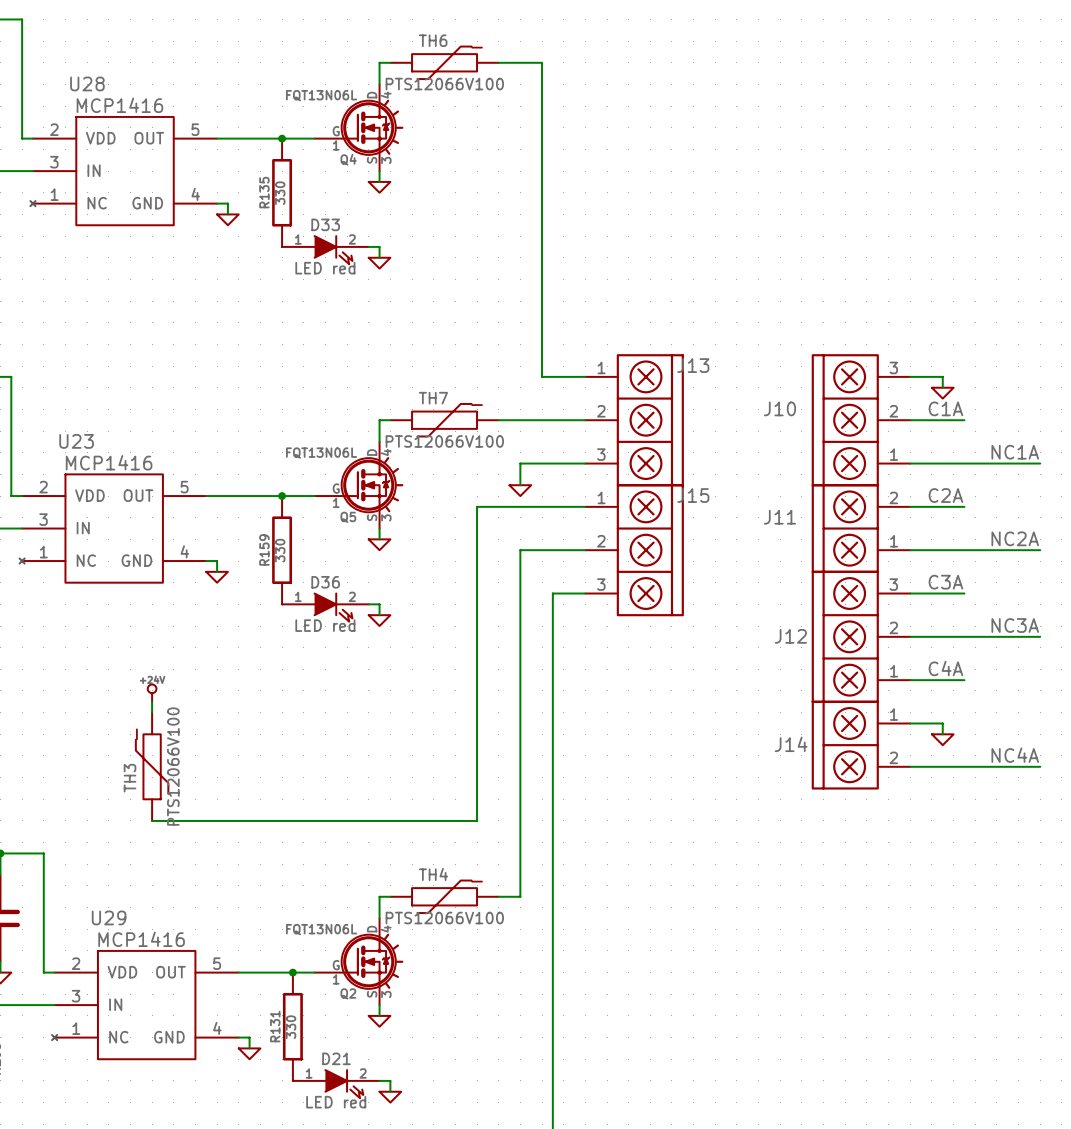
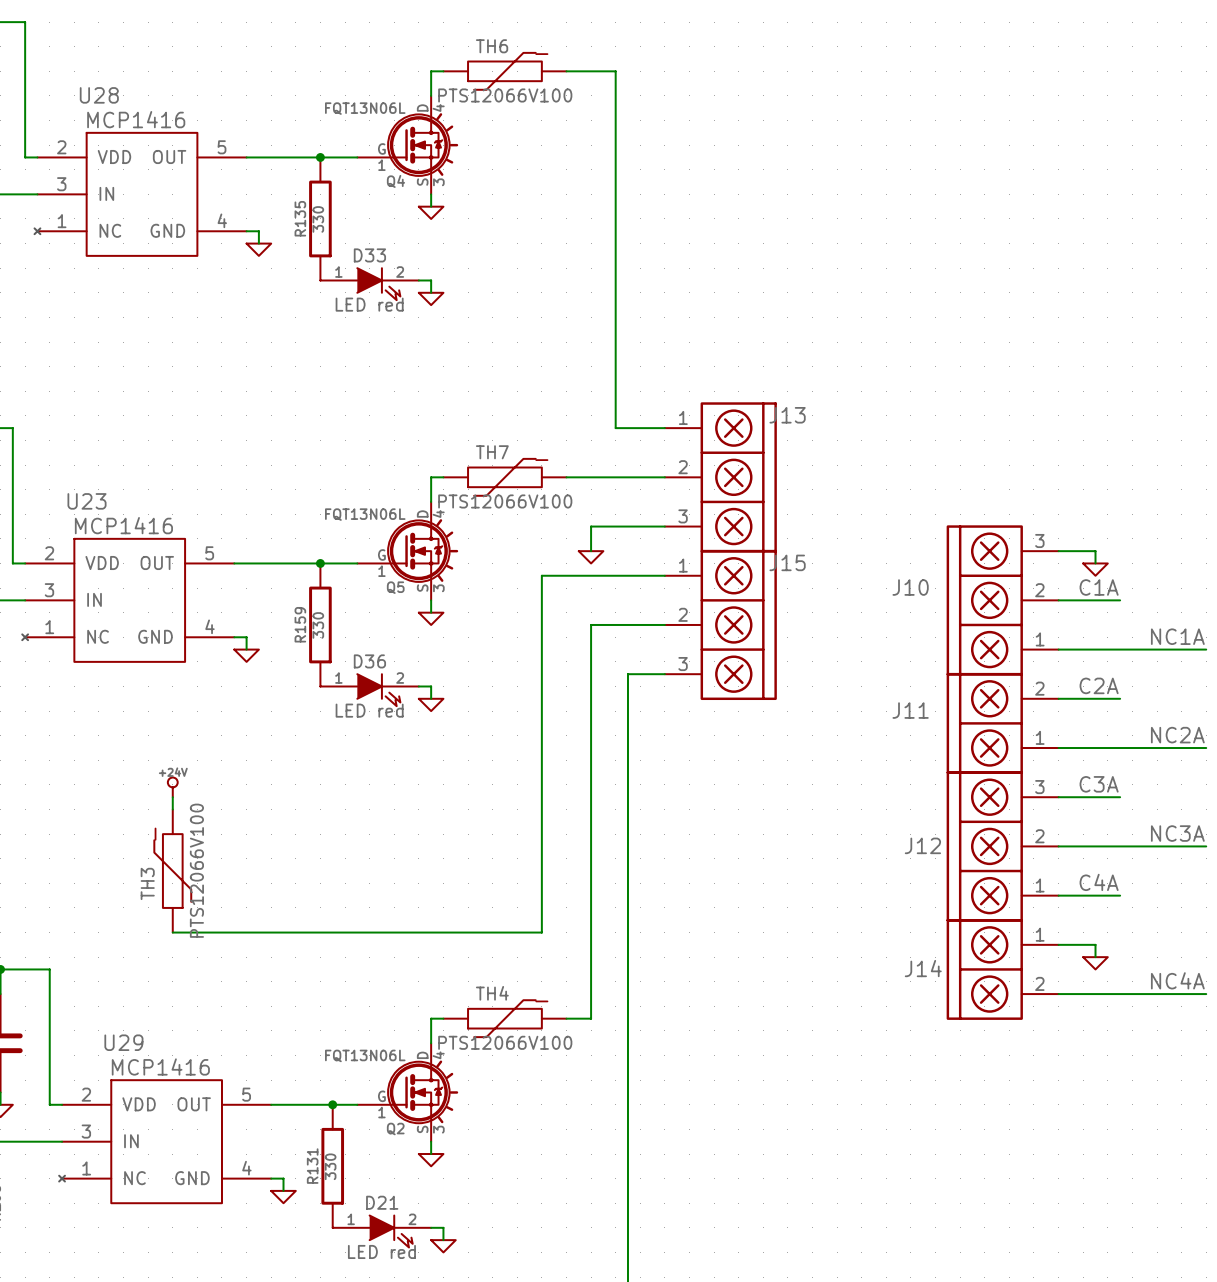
wire: (910, 376) (942, 376) (942, 387) -> (1058, 551) (1095, 551) (1095, 563)
power symbol position: (942, 393) -> (1095, 569)
label position: C1A (945, 408) -> C1A (1099, 587)
J10 position: (860, 420) -> (1002, 600)
wire: (910, 420) (964, 420) -> (1058, 600) (1120, 600)
label position: NC1A (1015, 452) -> NC1A (1177, 636)
wire: (910, 463) (1040, 463) -> (1058, 649) (1206, 649)
label position: C2A (945, 495) -> C2A (1099, 685)
wire: (910, 506) (964, 506) -> (1058, 698) (1120, 698)
J11 position: (860, 528) -> (1002, 723)
label position: NC2A (1015, 538) -> NC2A (1177, 735)
wire: (910, 550) (1040, 550) -> (1058, 748) (1206, 748)
label position: C3A (945, 582) -> C3A (1099, 784)
wire: (910, 593) (964, 593) -> (1058, 797) (1120, 797)
label position: NC3A (1015, 625) -> NC3A (1177, 833)
J12 position: (860, 636) -> (1002, 846)
wire: (910, 636) (1040, 636) -> (1058, 846) (1206, 846)
label position: C4A (945, 668) -> C4A (1099, 882)
wire: (910, 680) (964, 680) -> (1058, 895) (1120, 895)
wire: (910, 723) (942, 723) (942, 734) -> (1058, 944) (1095, 944) (1095, 957)
power symbol position: (942, 739) -> (1095, 963)
J14 position: (860, 745) -> (1002, 969)
label position: NC4A (1015, 755) -> NC4A (1177, 980)
wire: (910, 766) (1040, 766) -> (1058, 994) (1206, 994)

